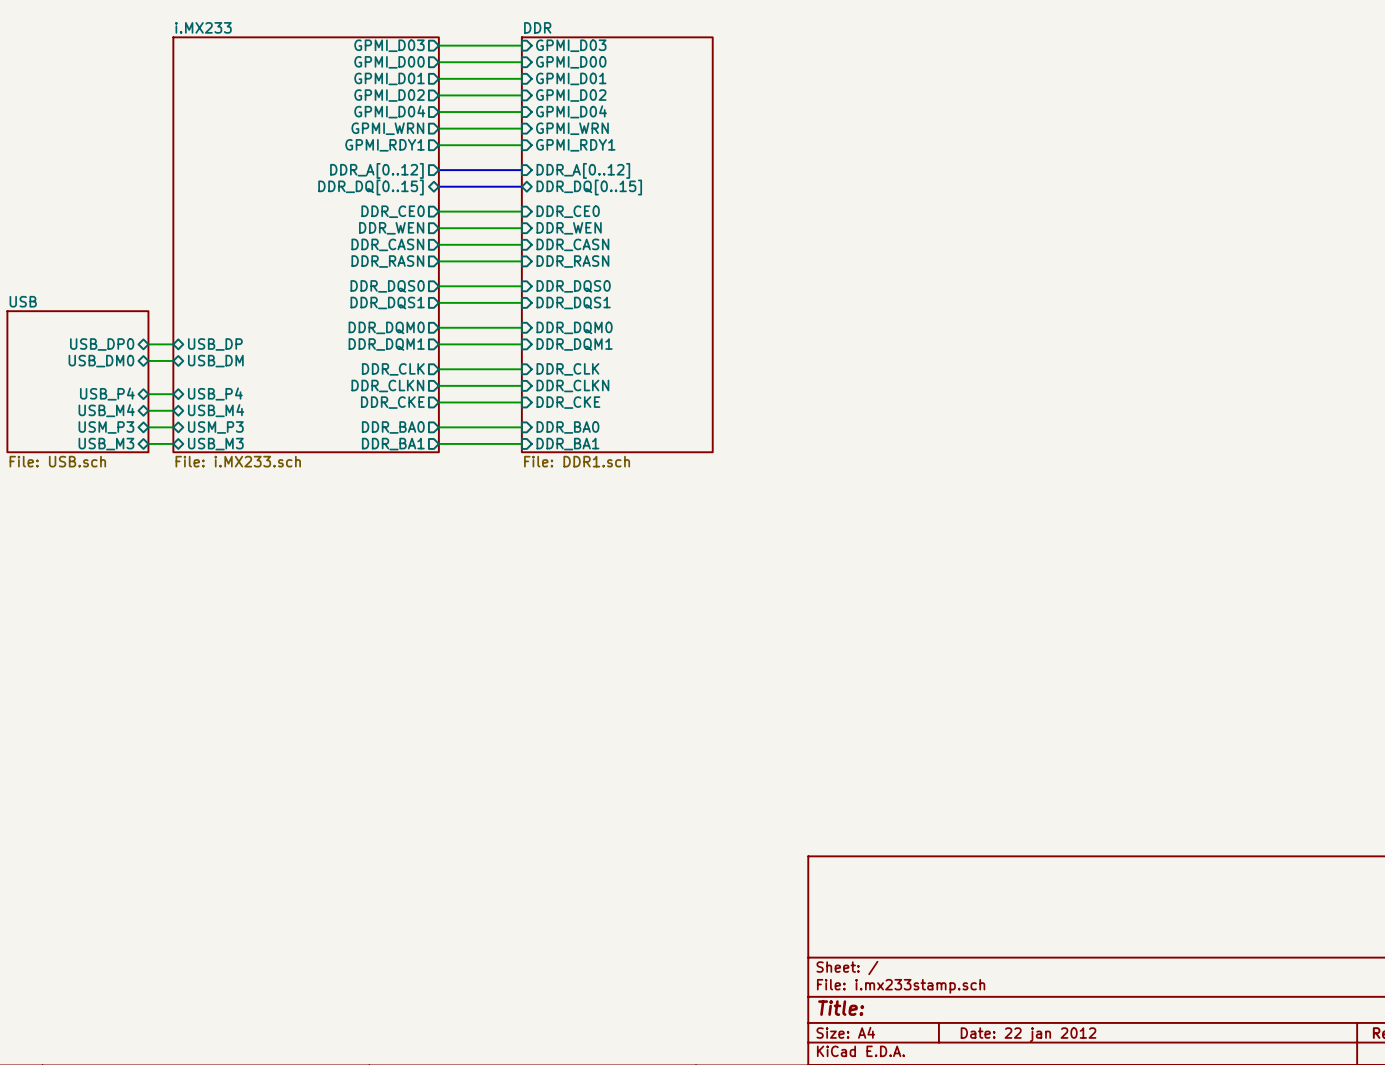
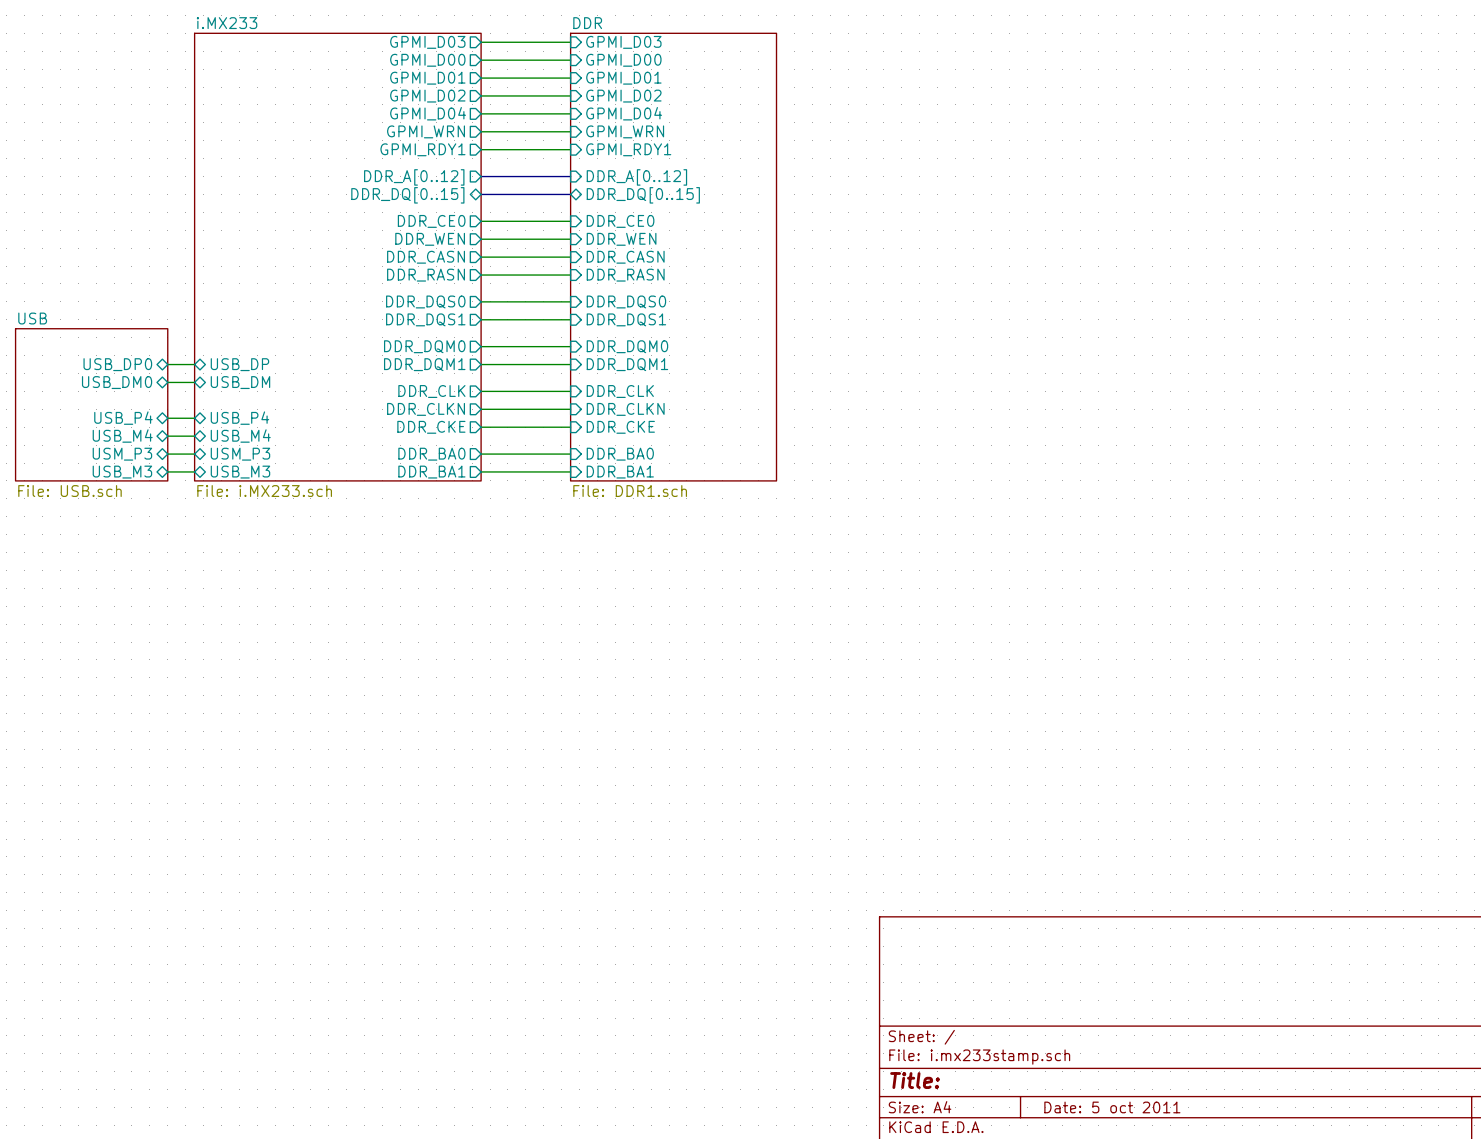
title block: Date: 22 jan 2012 (1028, 1034) -> Date: 5 oct 2011 (1112, 1107)

